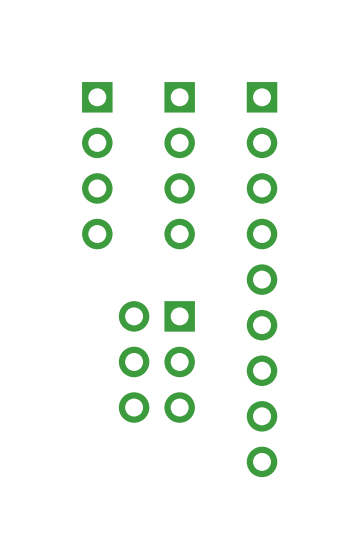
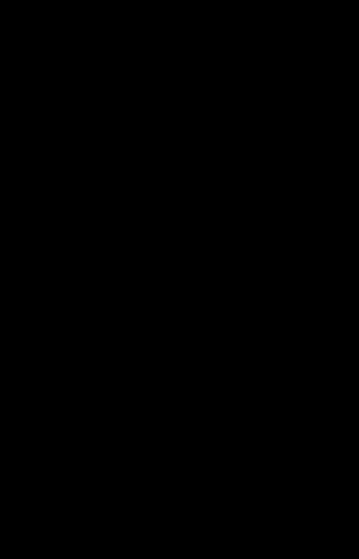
part: (97, 165) -> none
part: (179, 165) -> none
part: (262, 279) -> none
part: (156, 361) -> none

